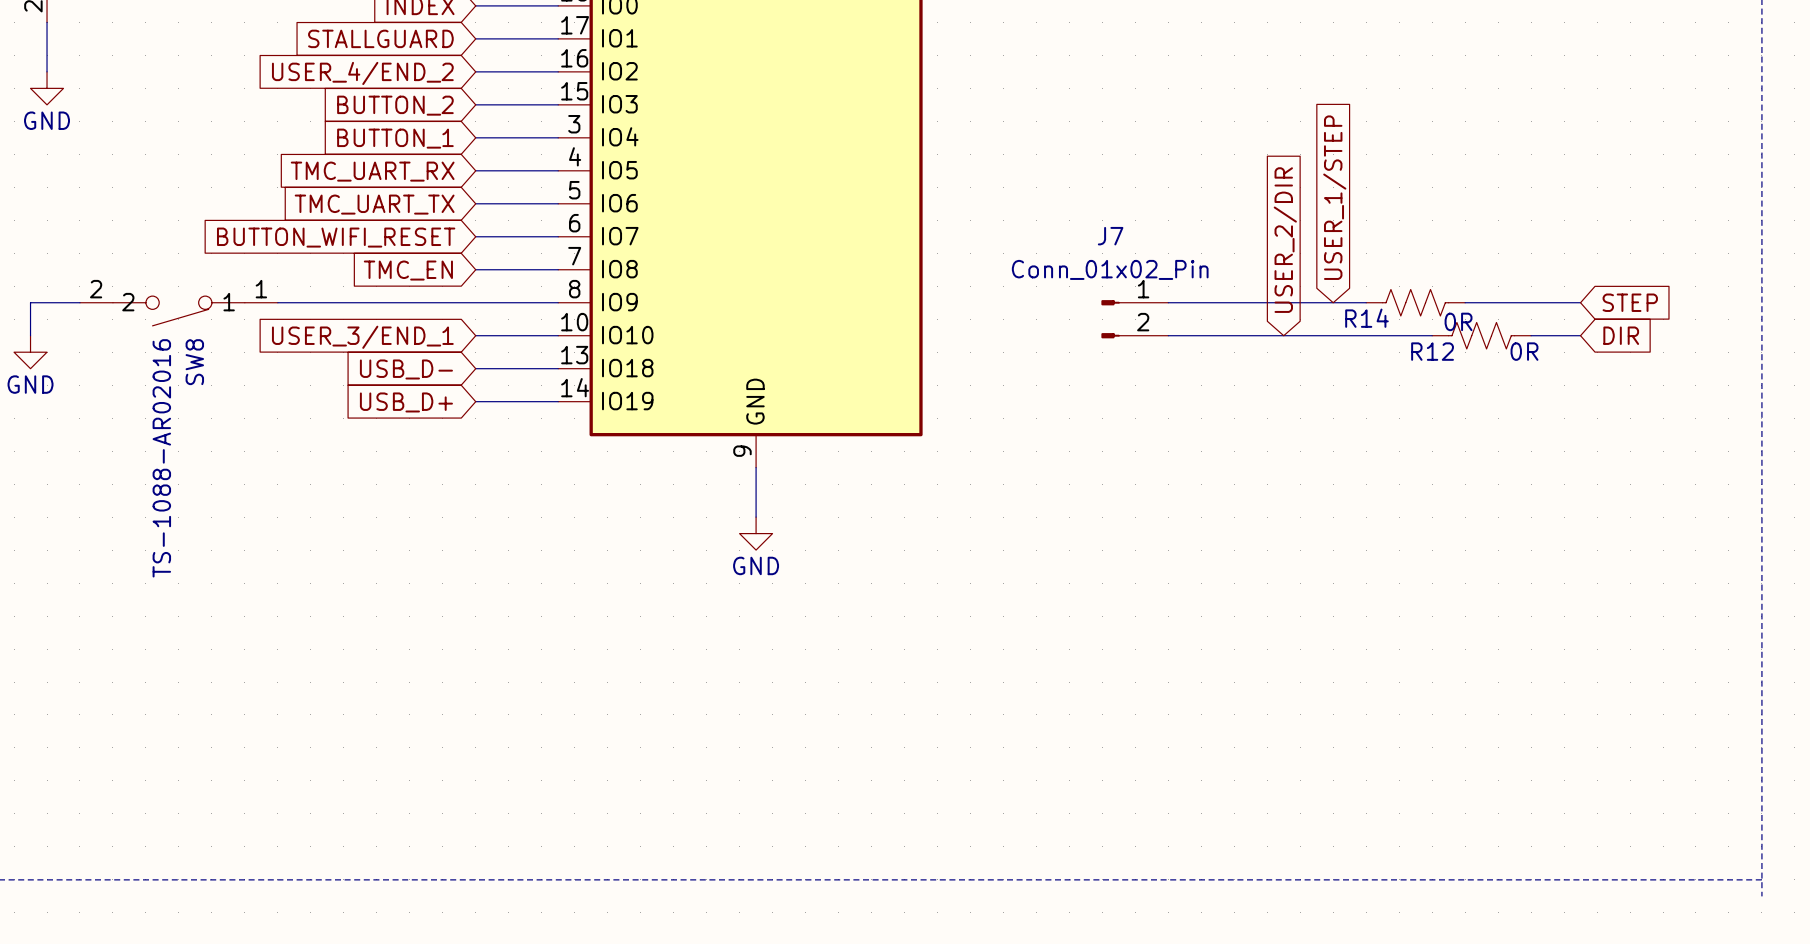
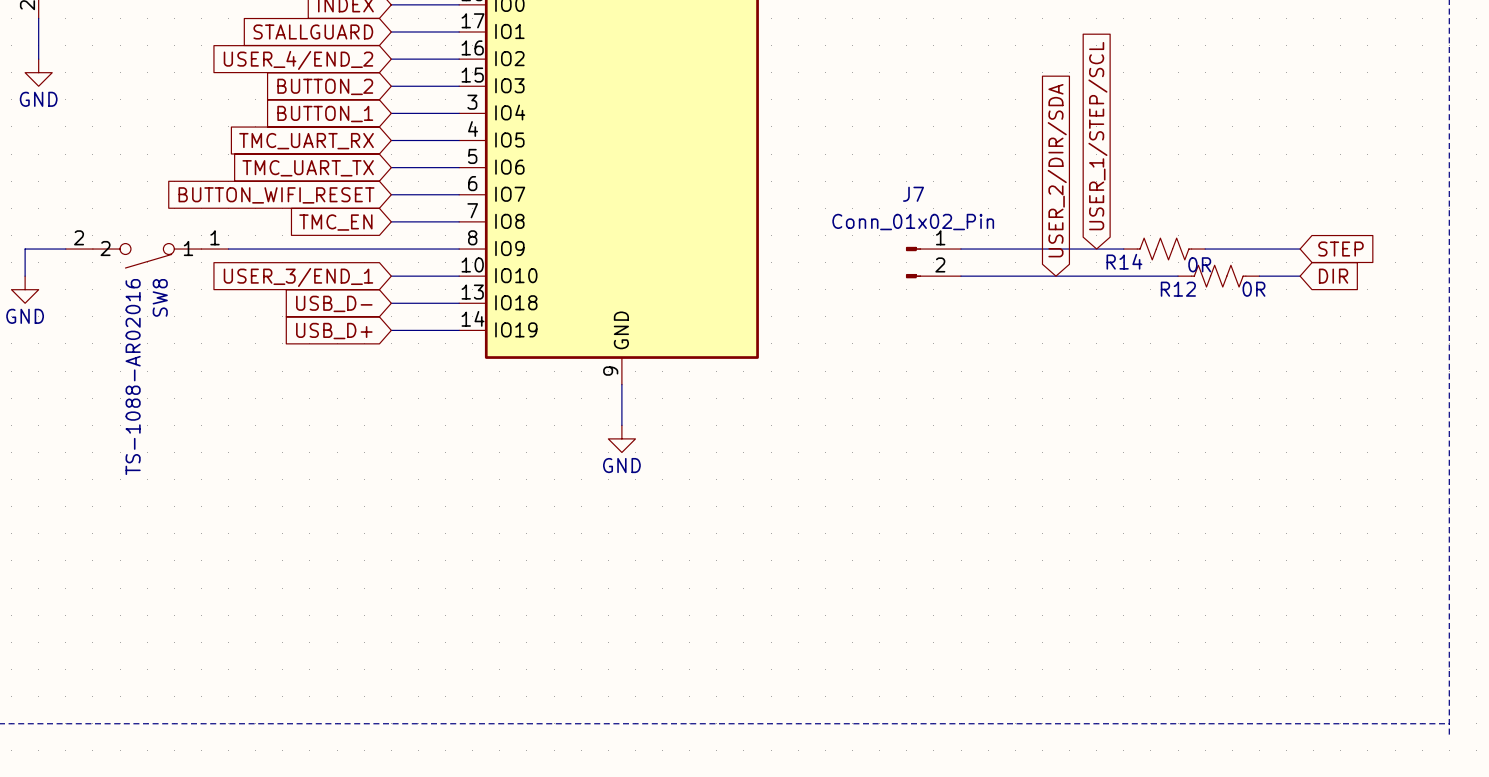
global label: USER_1/STEP (1334, 197) -> USER_1/STEP/SCL (1097, 136)
global label: USER_2/DIR (1285, 240) -> USER_2/DIR/SDA (1057, 170)

